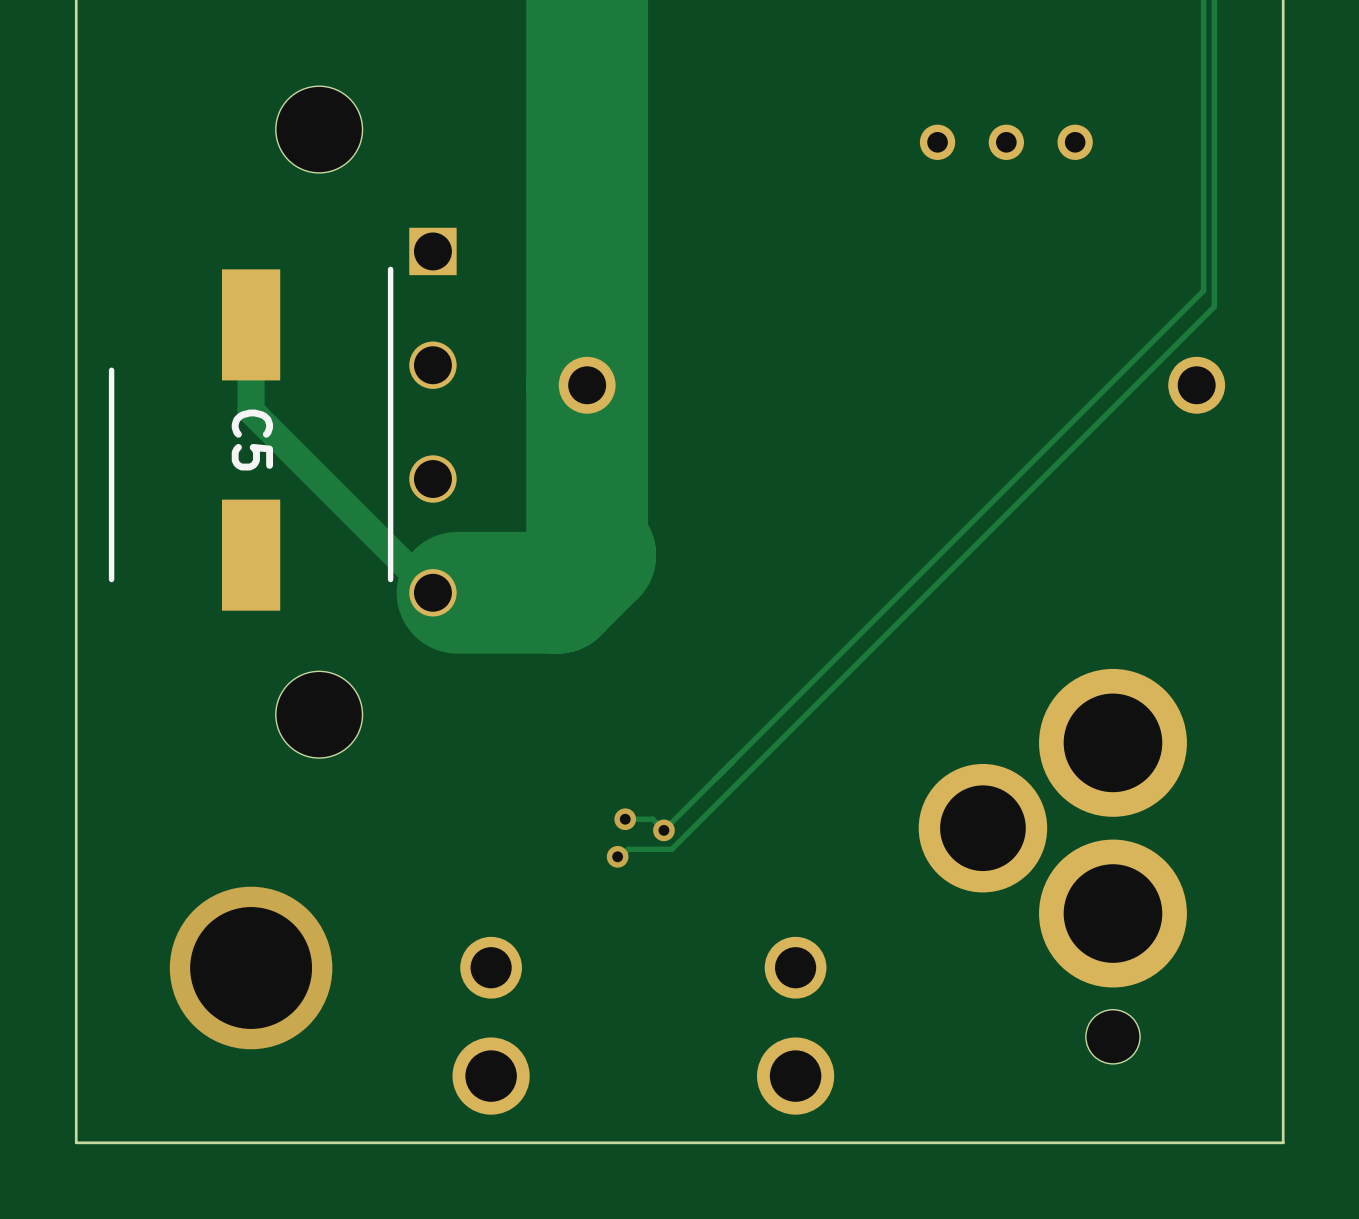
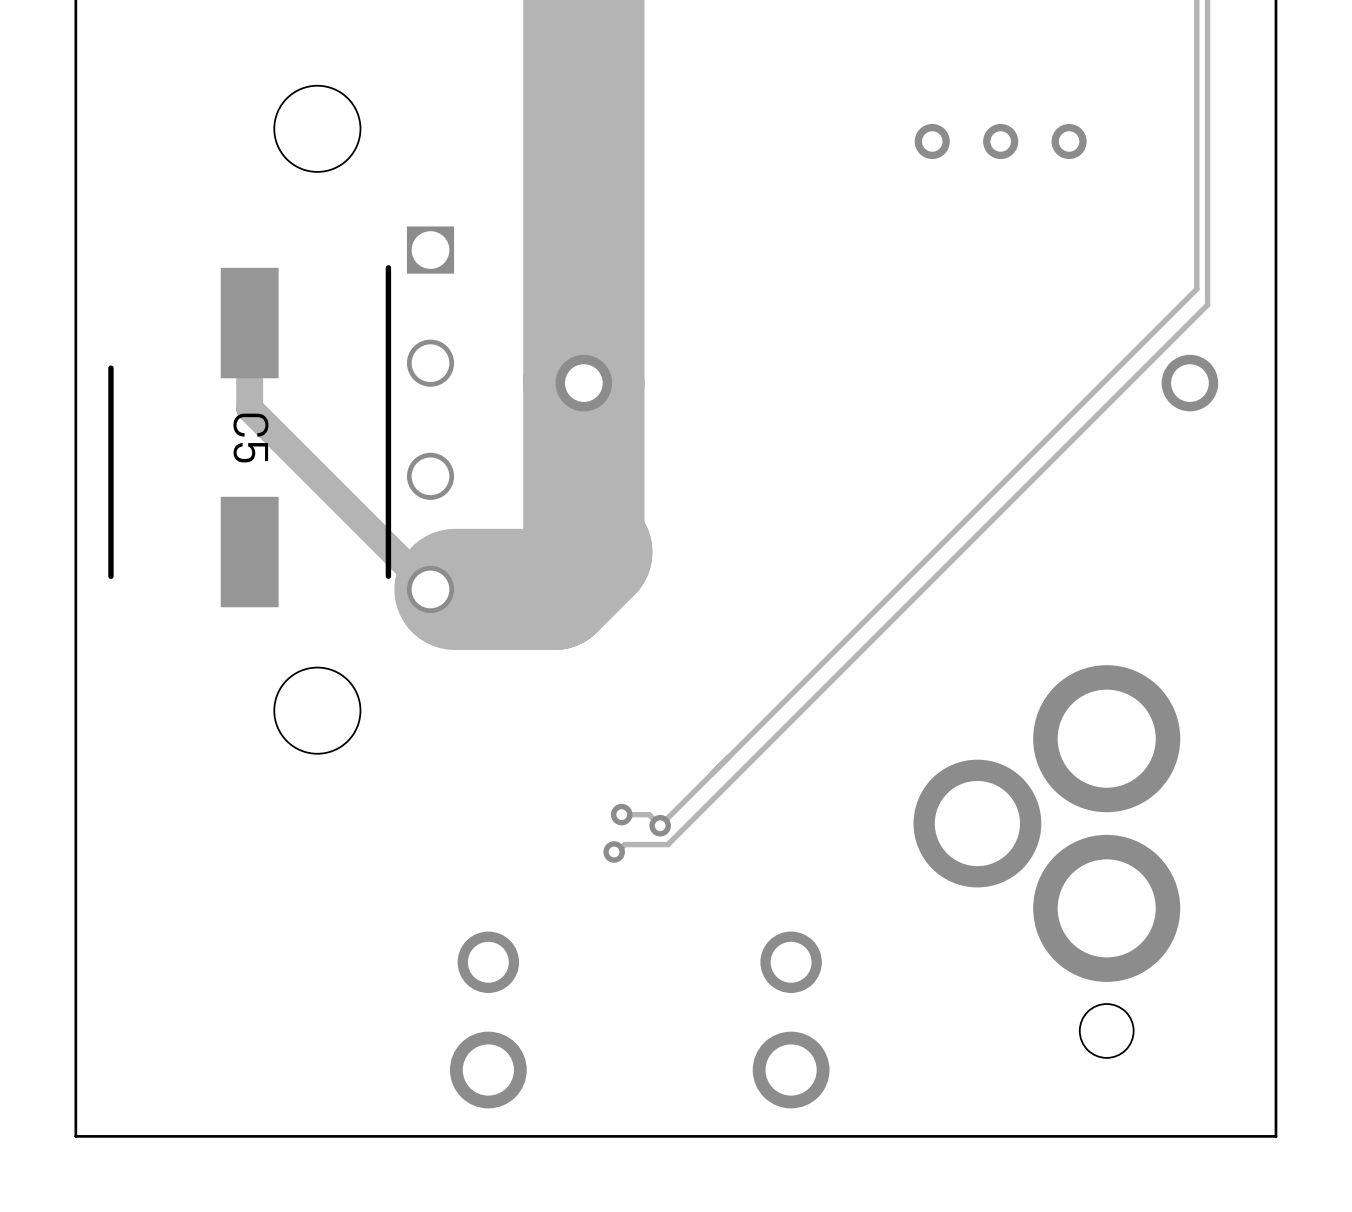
via: (251, 967) -> none

